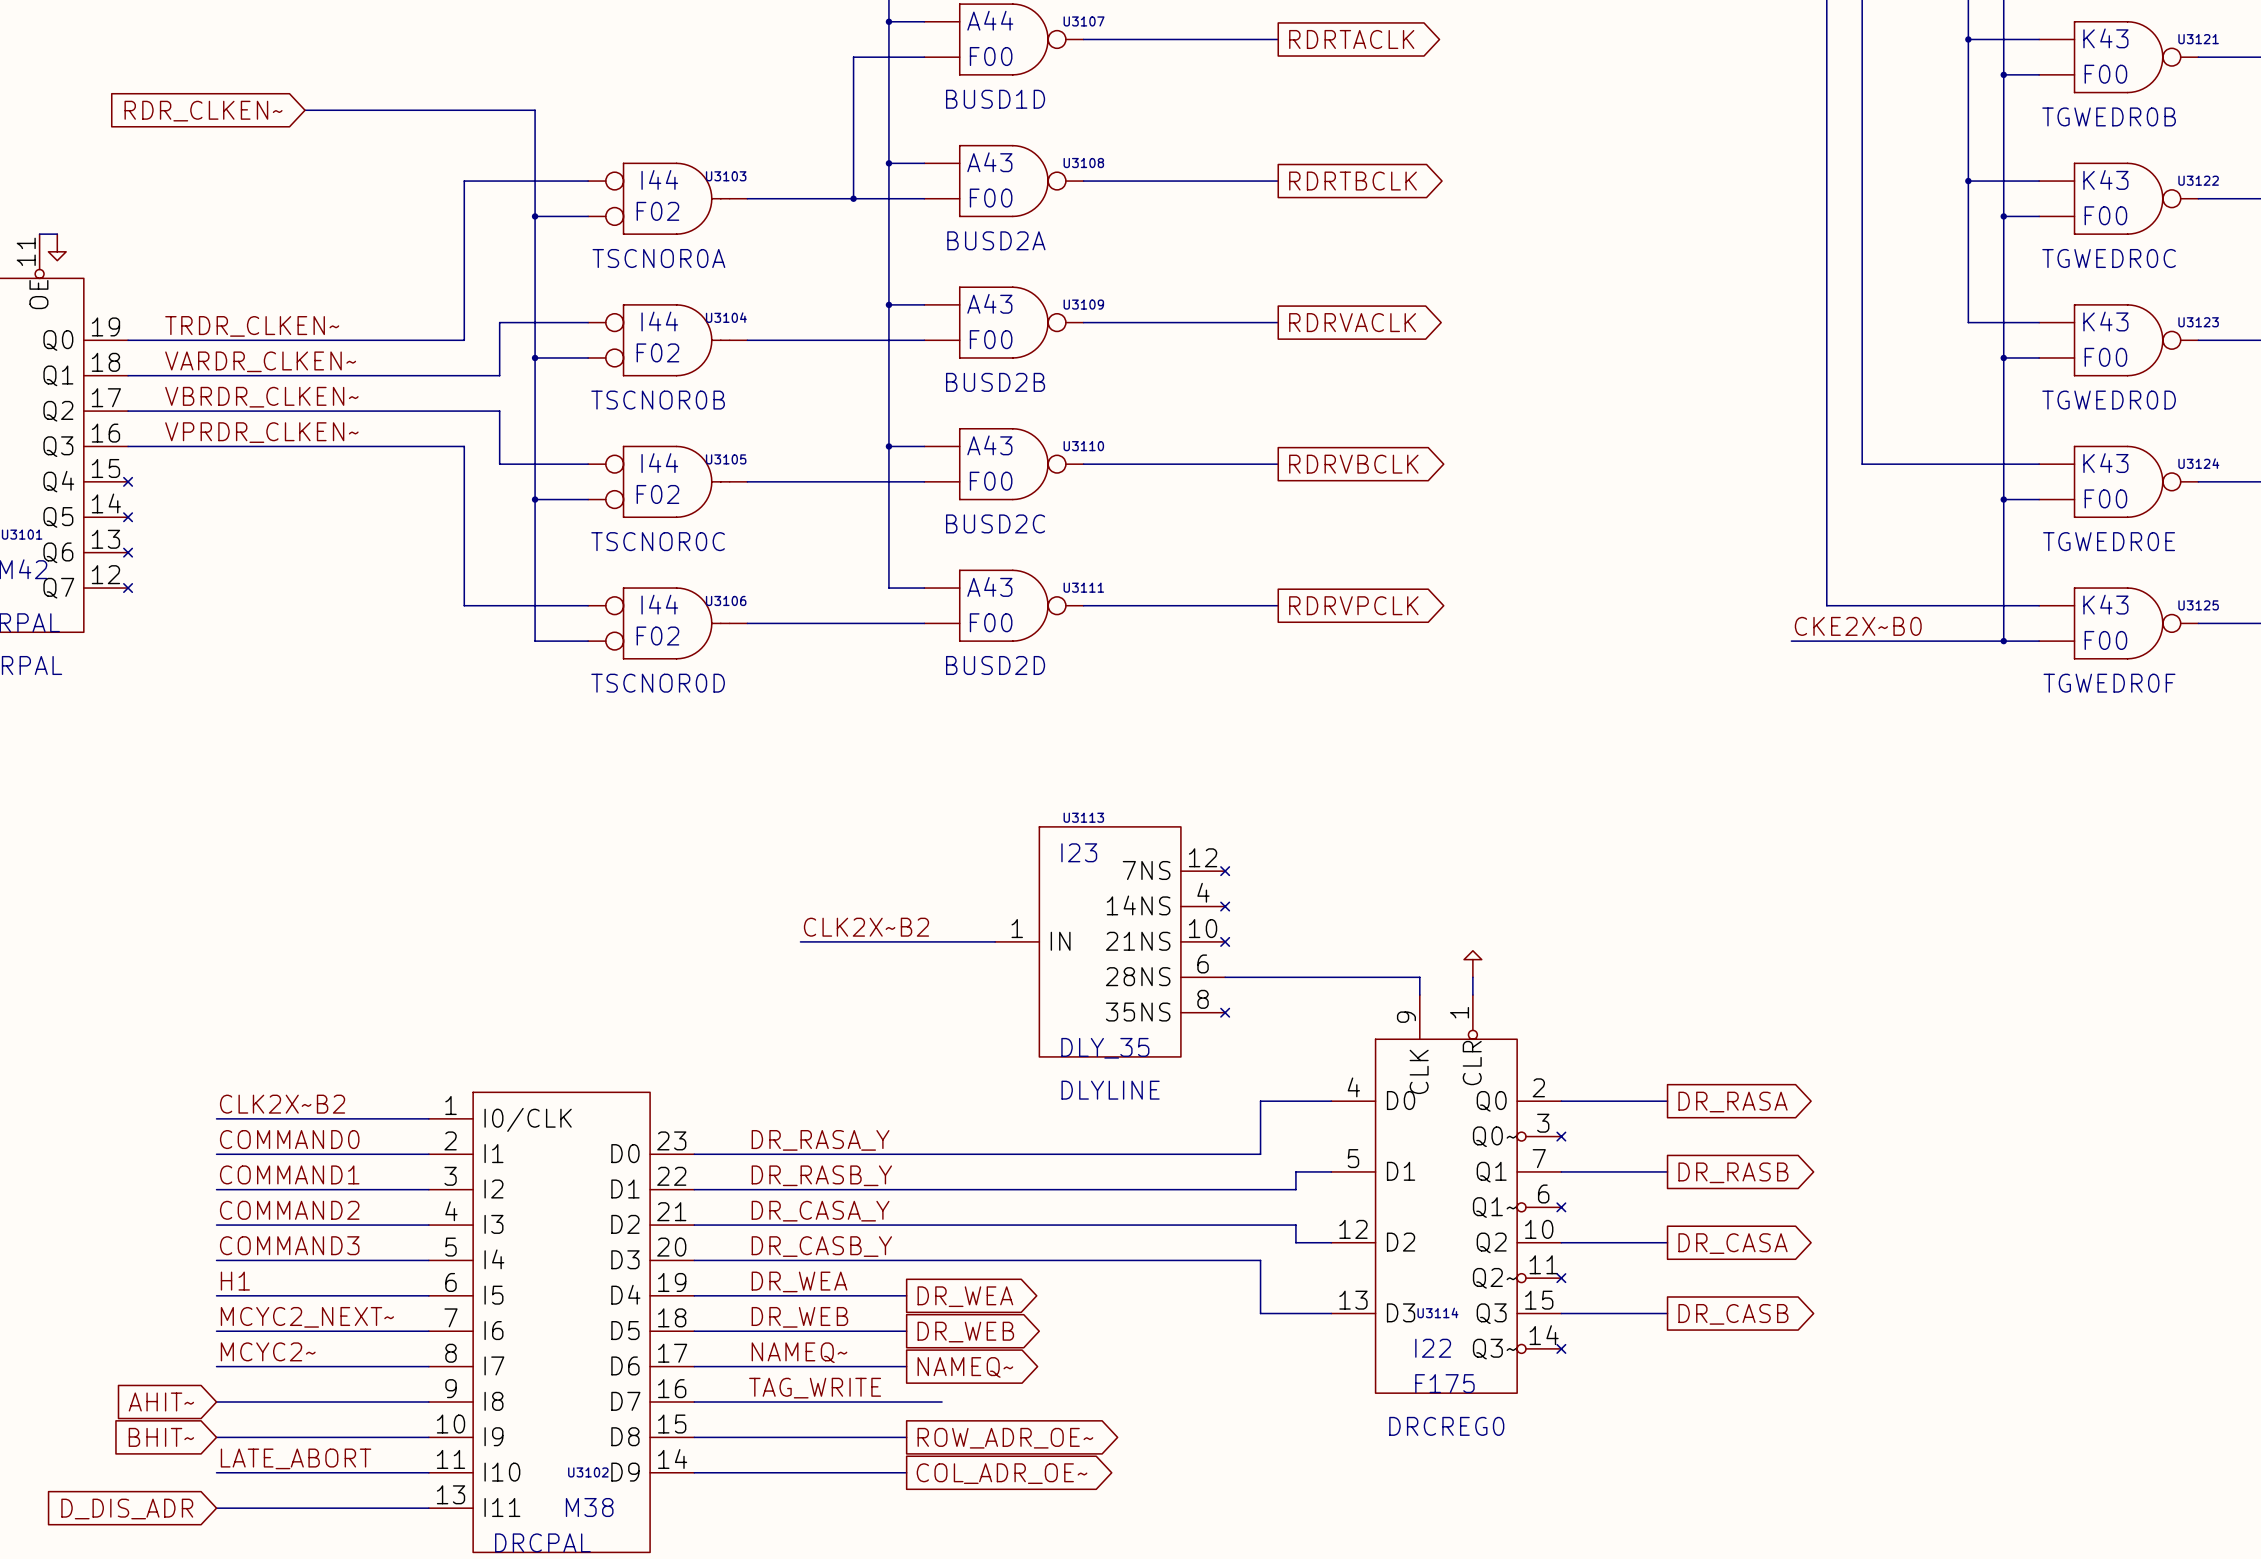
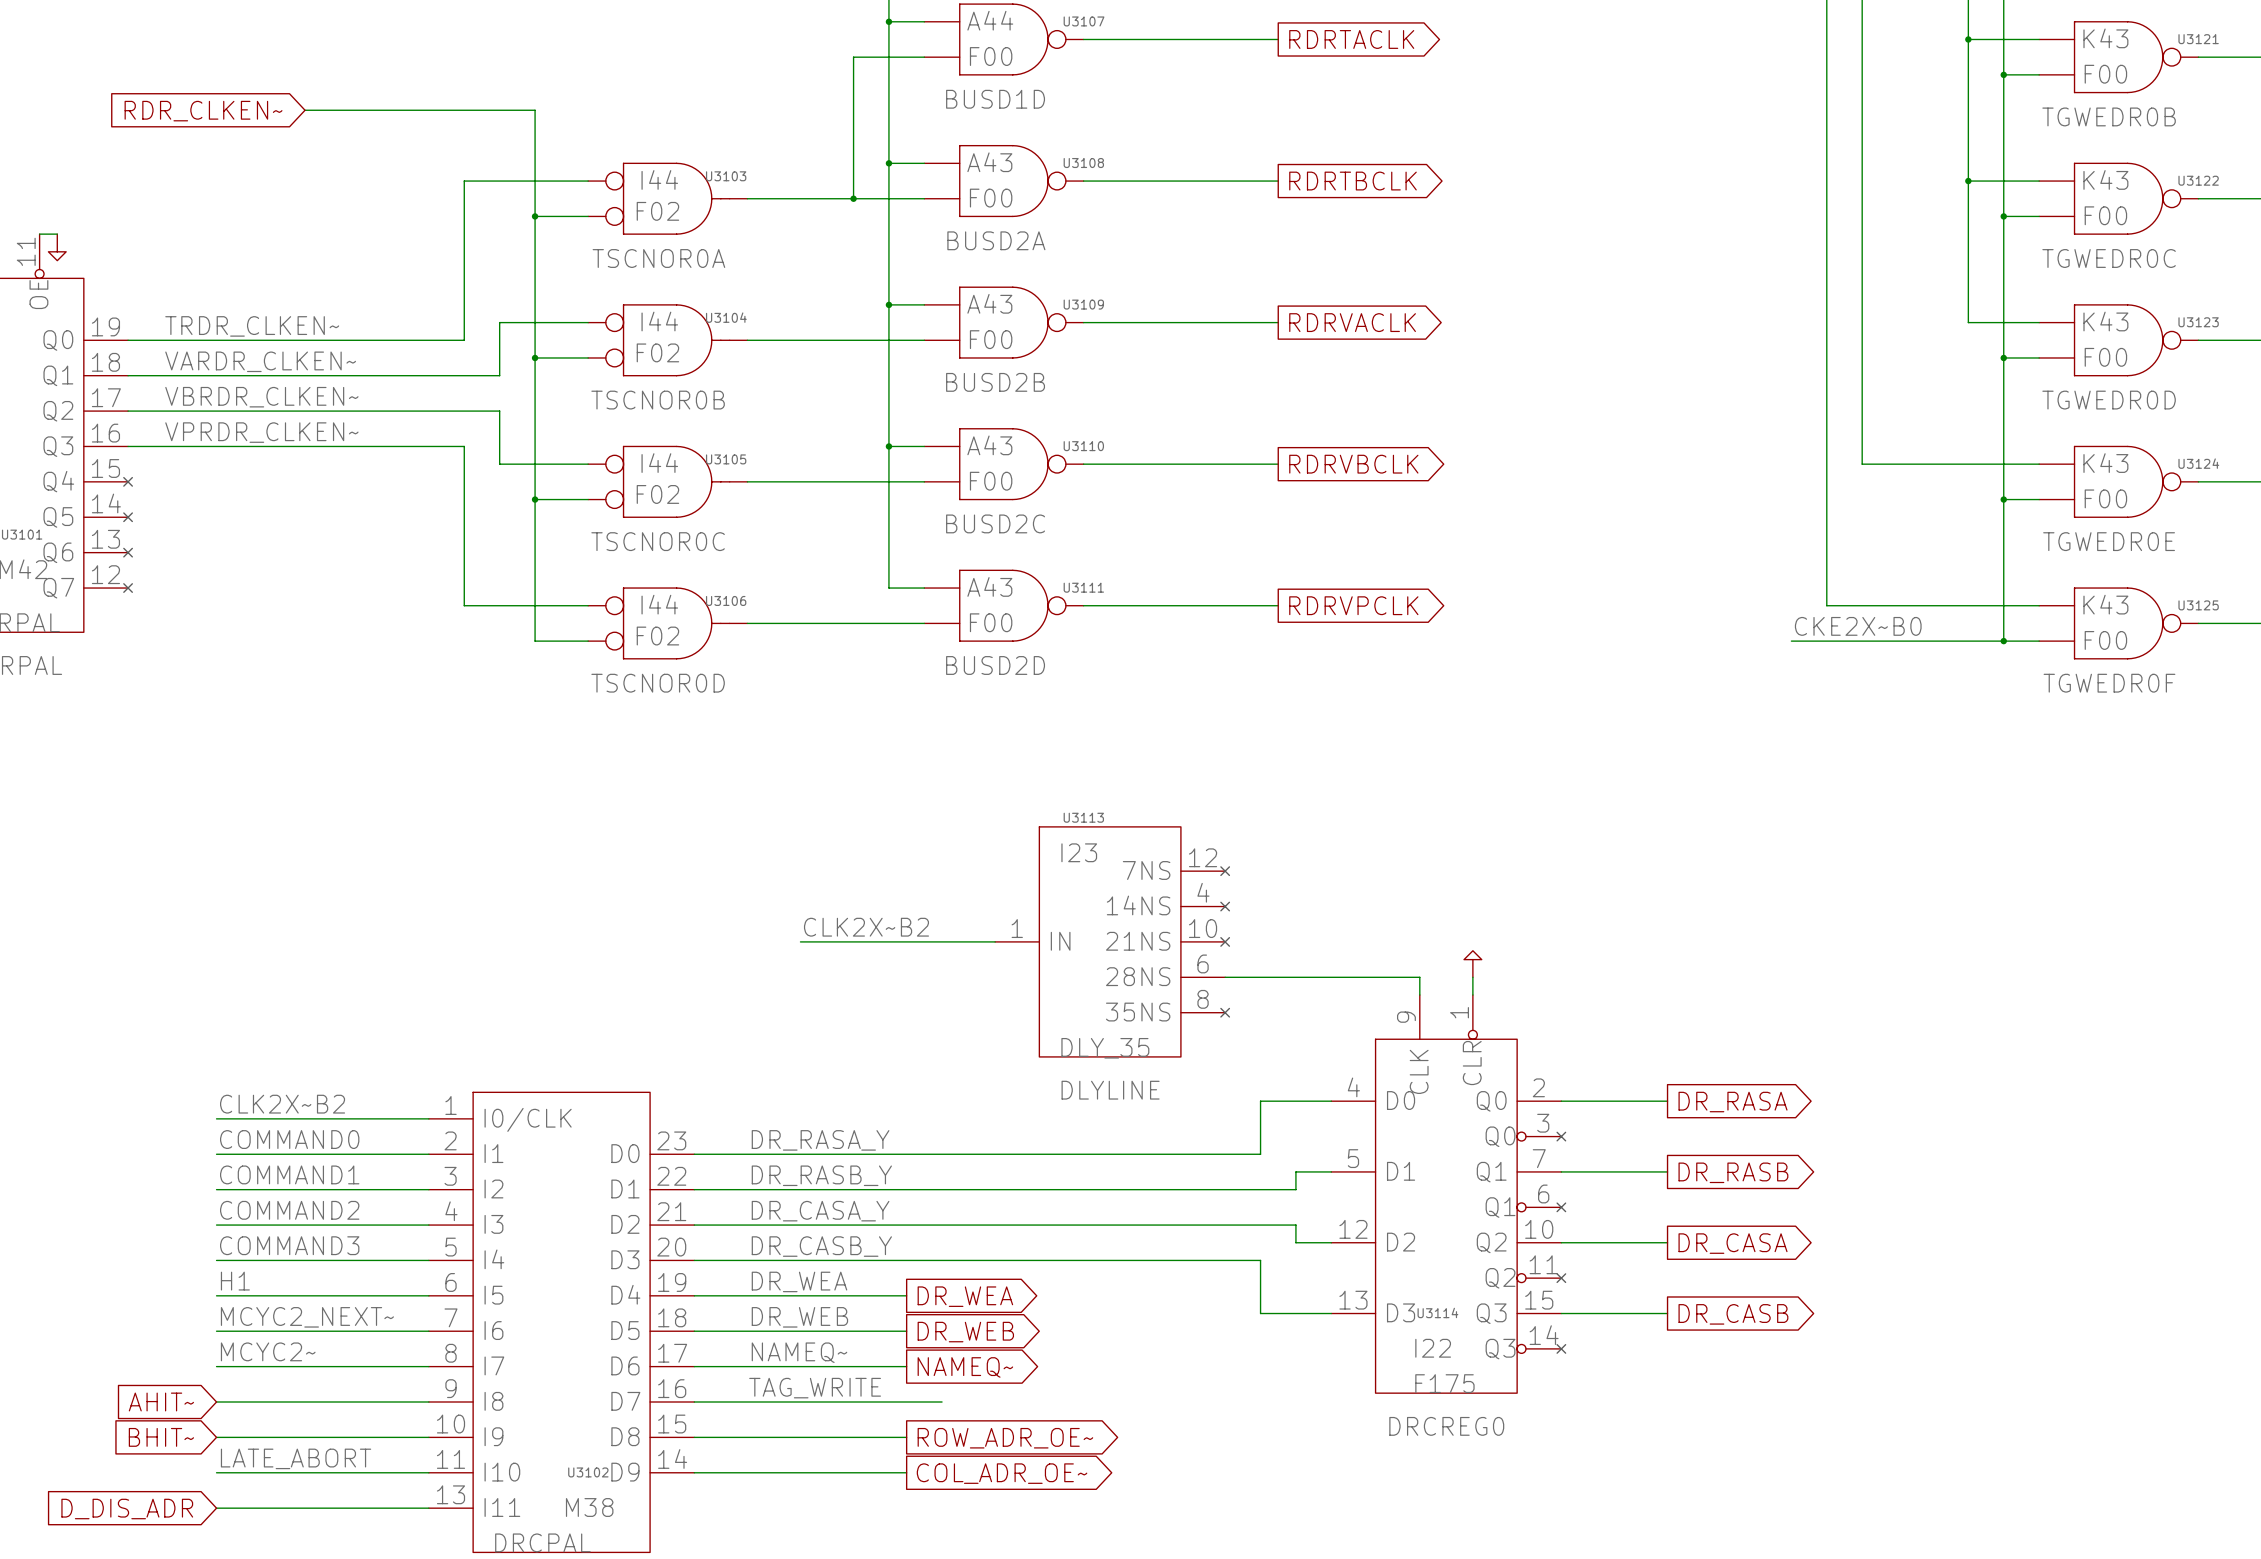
U3114 pin name: Q0~ (1494, 1136) -> Q0 (1500, 1136)
U3114 pin name: Q1~ (1494, 1207) -> Q1 (1500, 1207)
U3114 pin name: Q2~ (1494, 1278) -> Q2 (1500, 1278)
U3114 pin name: Q3~ (1494, 1349) -> Q3 (1500, 1349)

